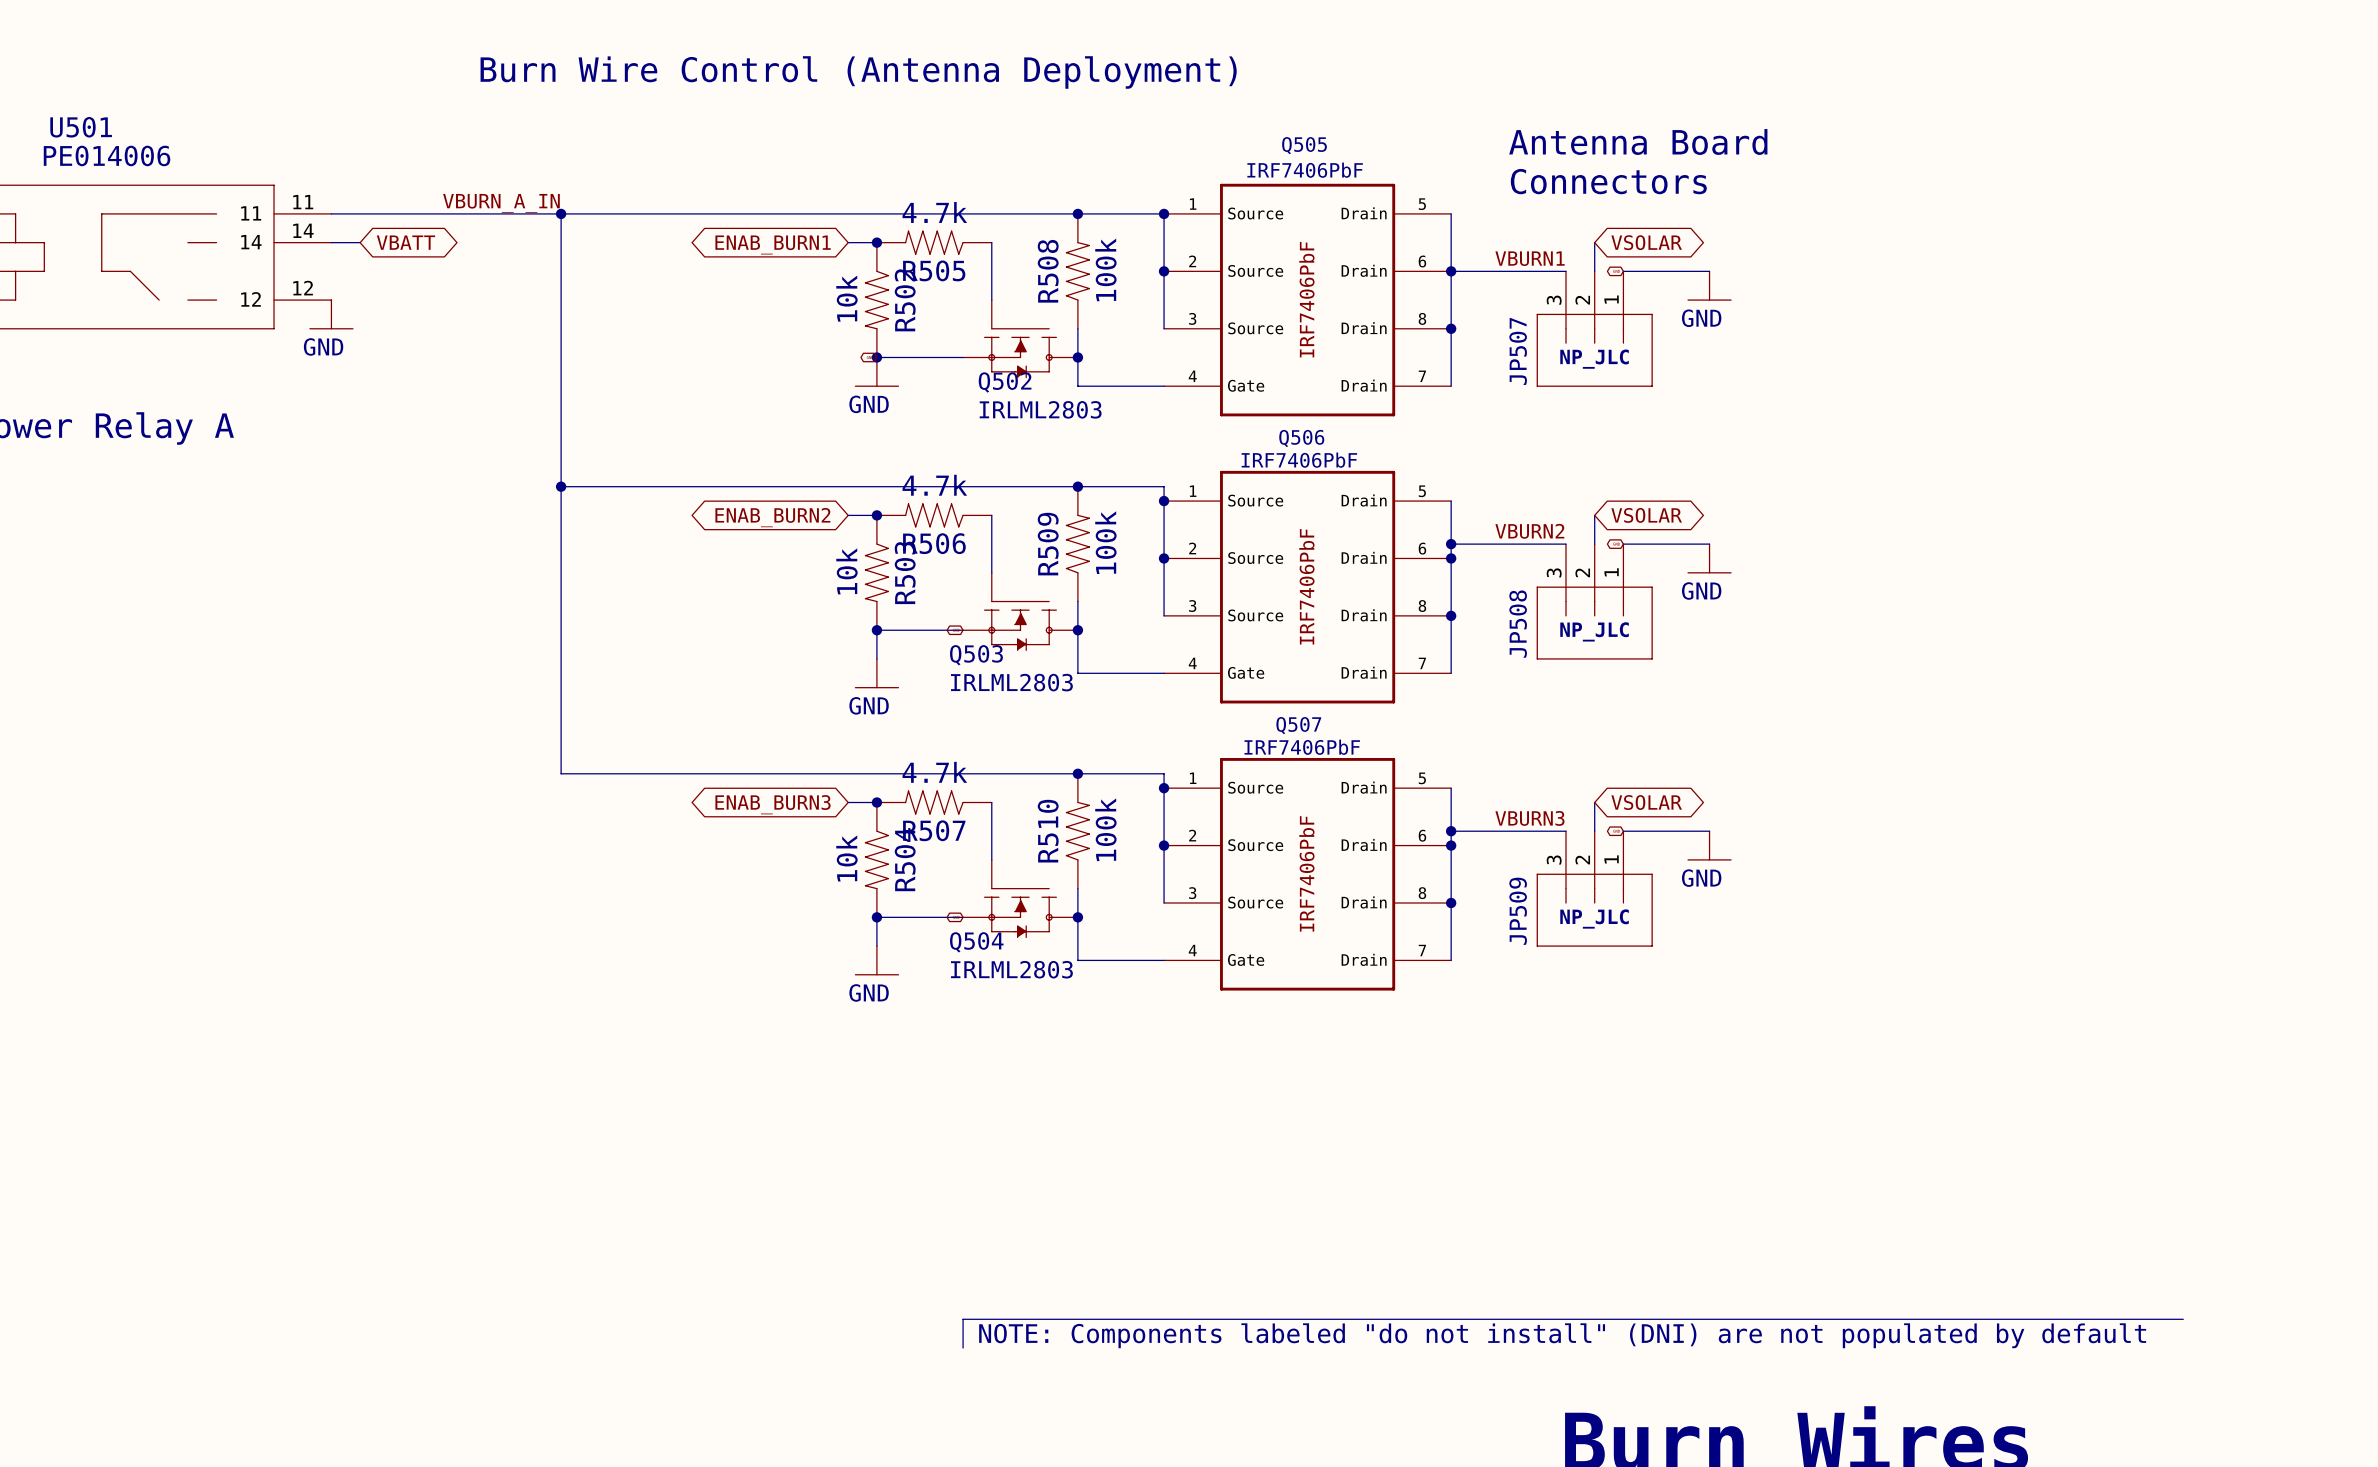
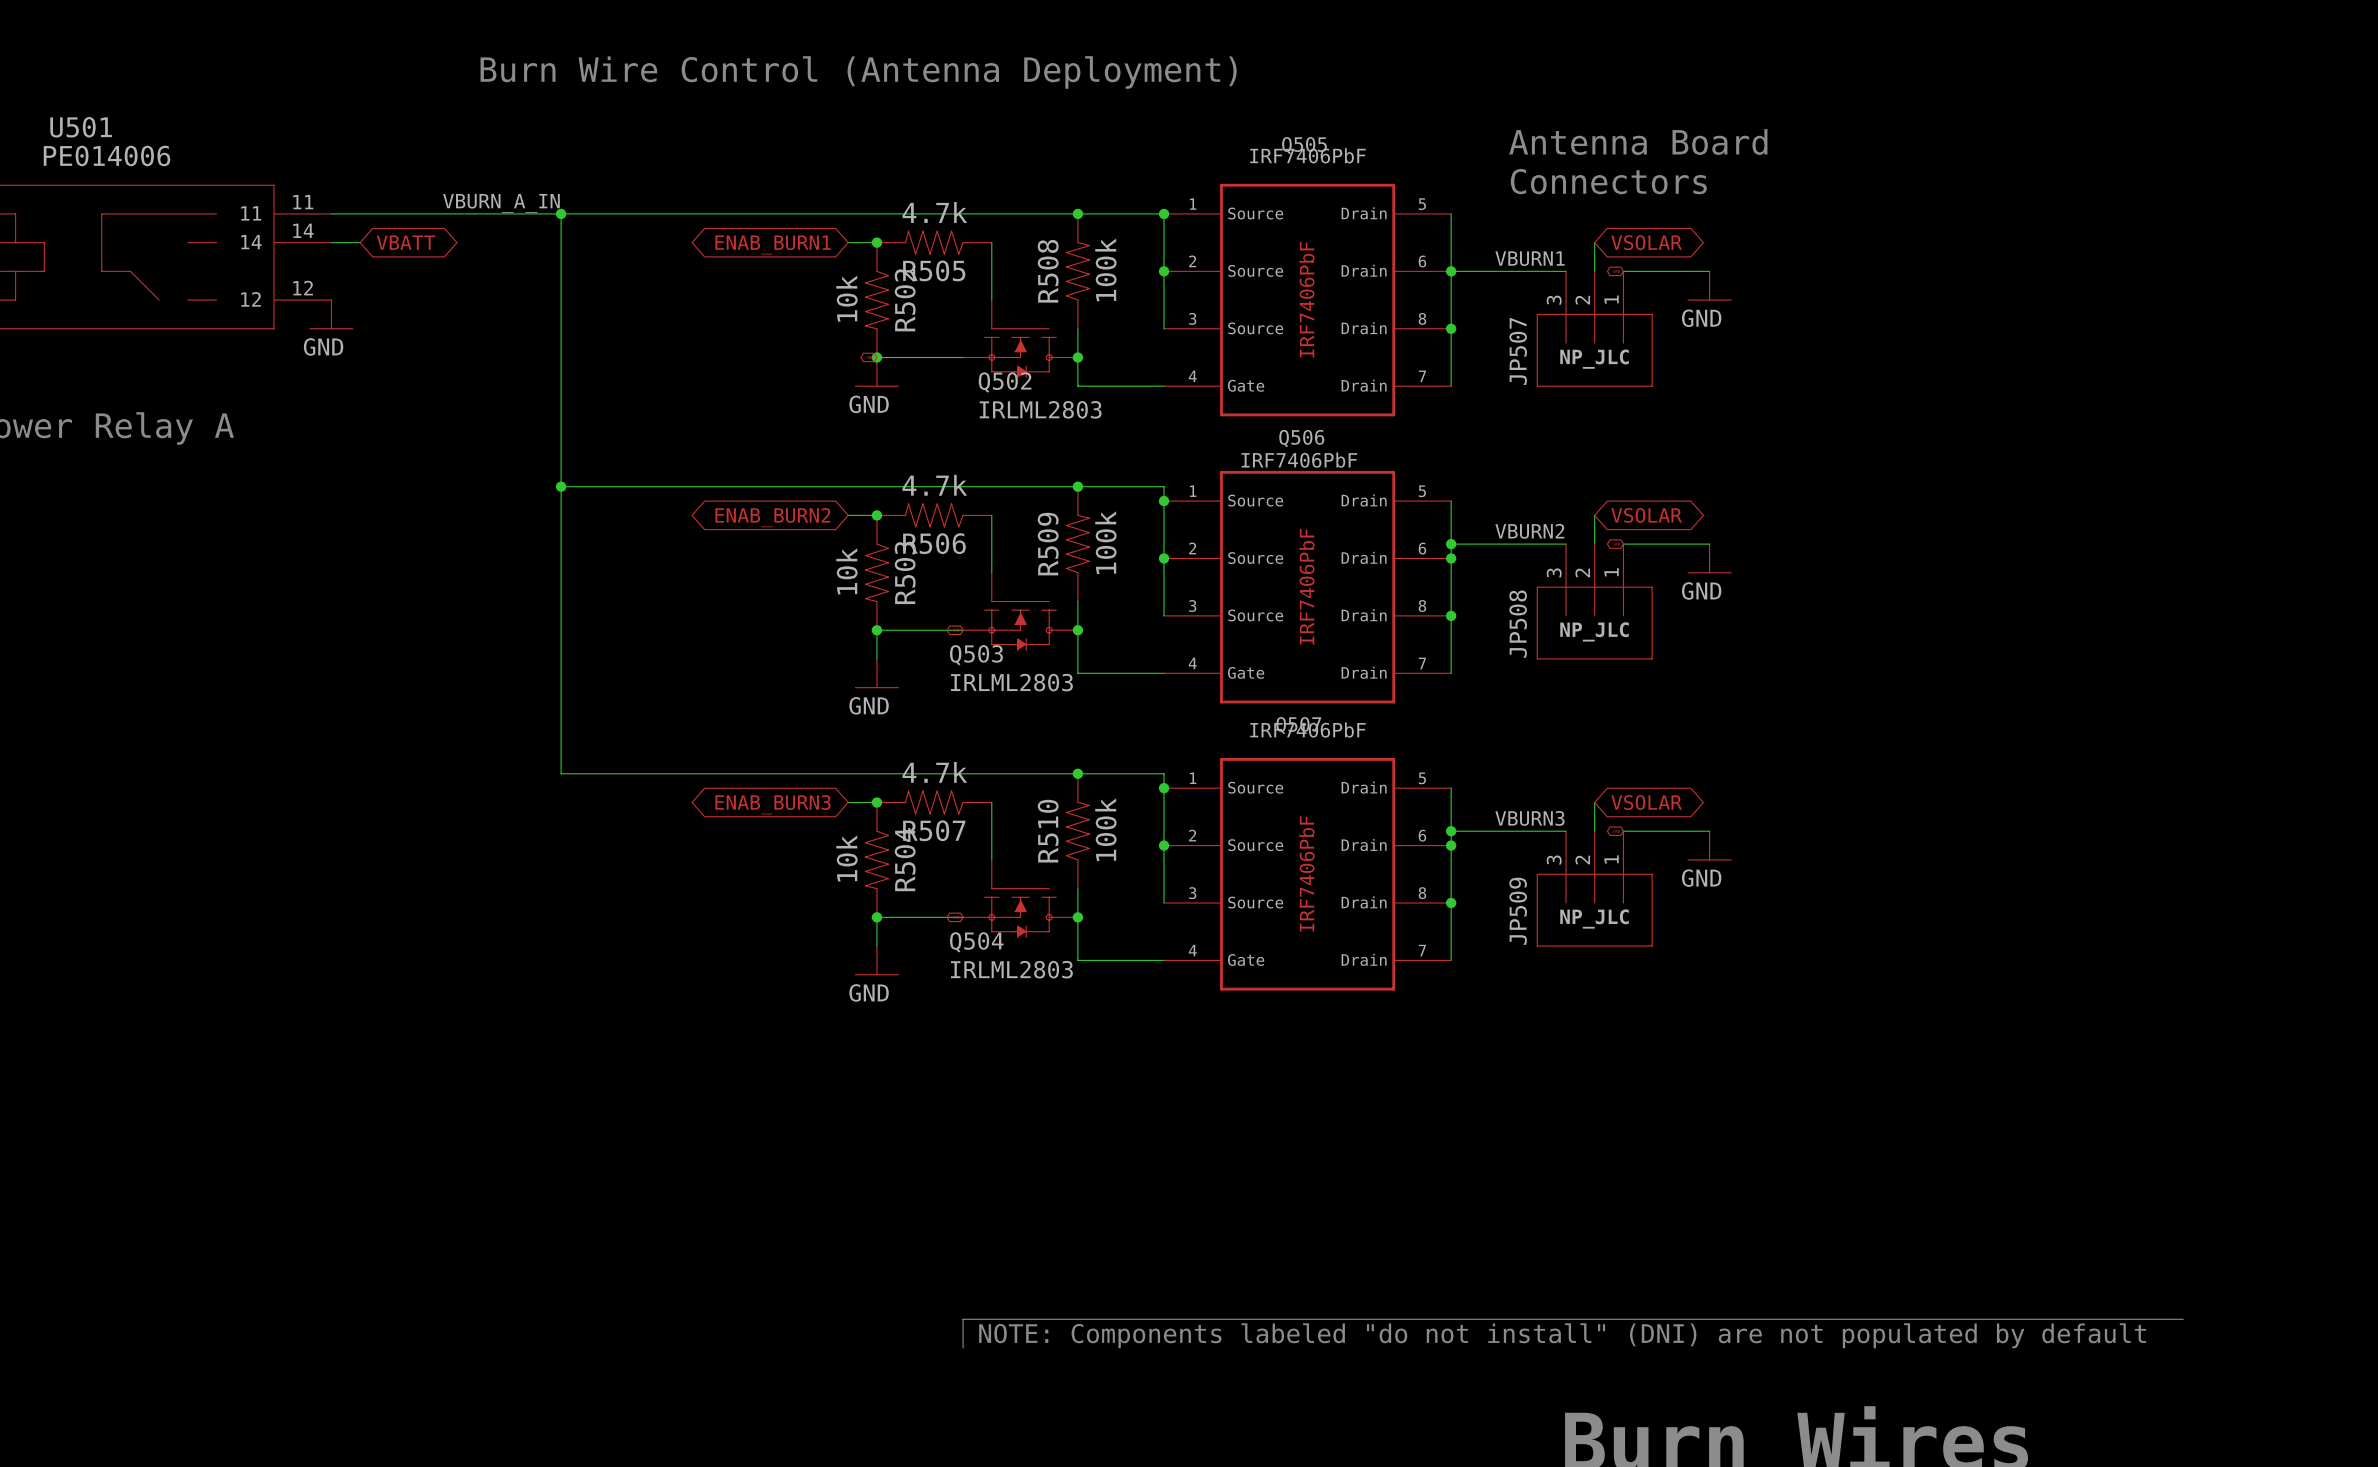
Q505 value position: IRF7406PbF (1305, 170) -> IRF7406PbF (1307, 155)
Q507 value position: IRF7406PbF (1302, 747) -> IRF7406PbF (1307, 730)

